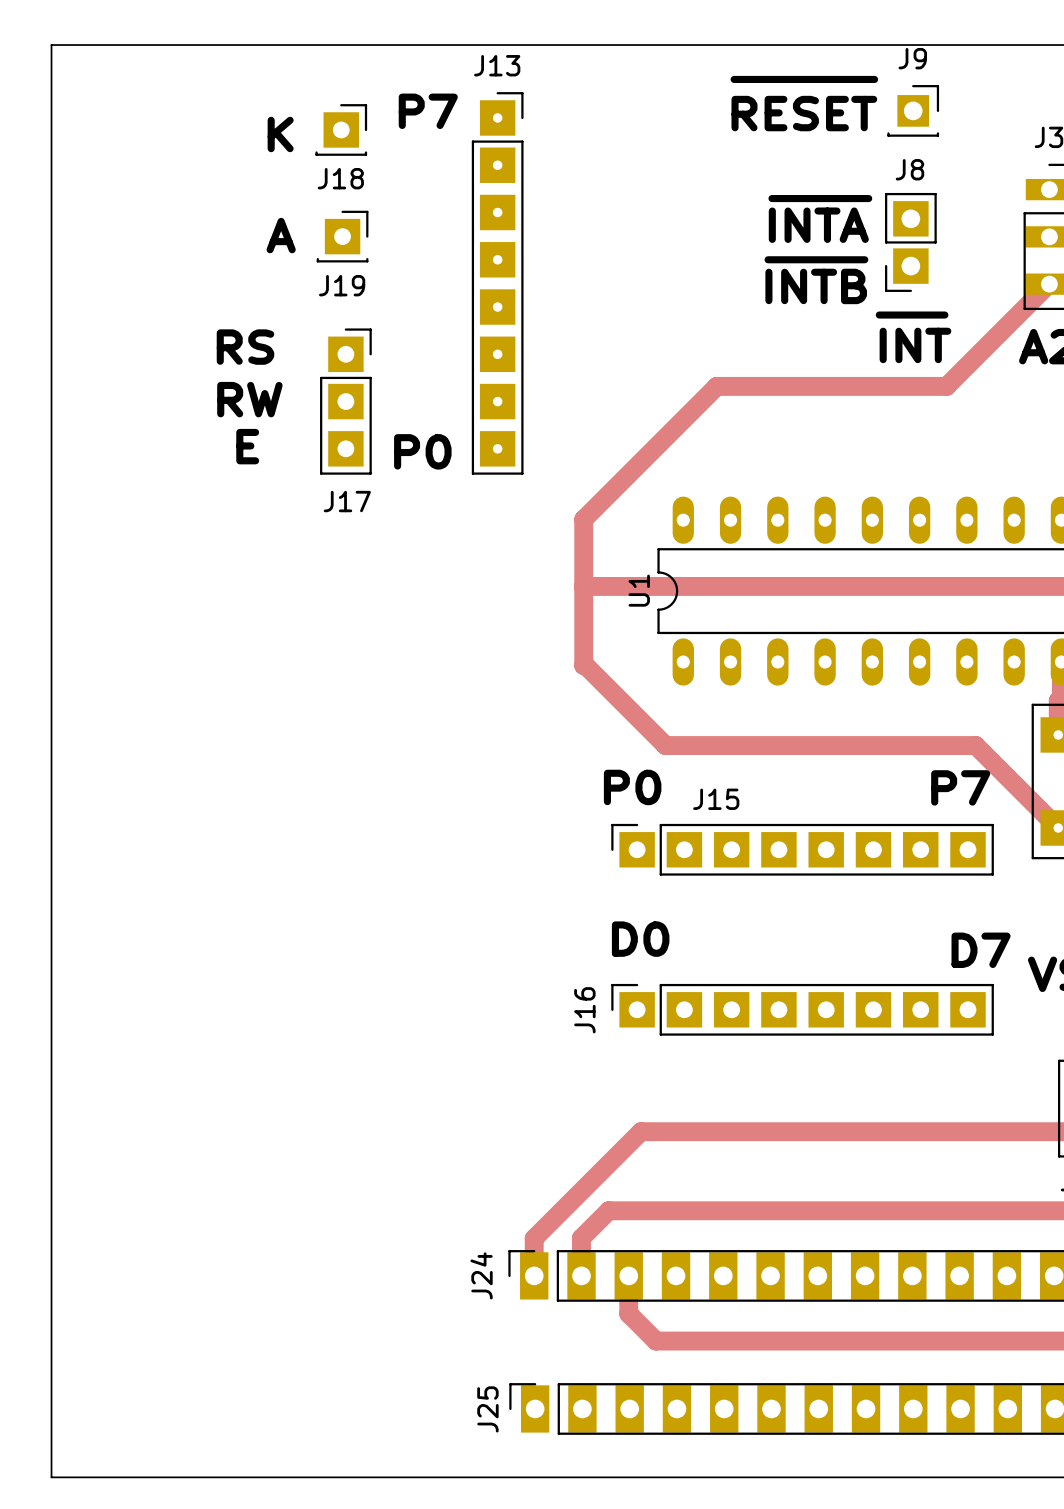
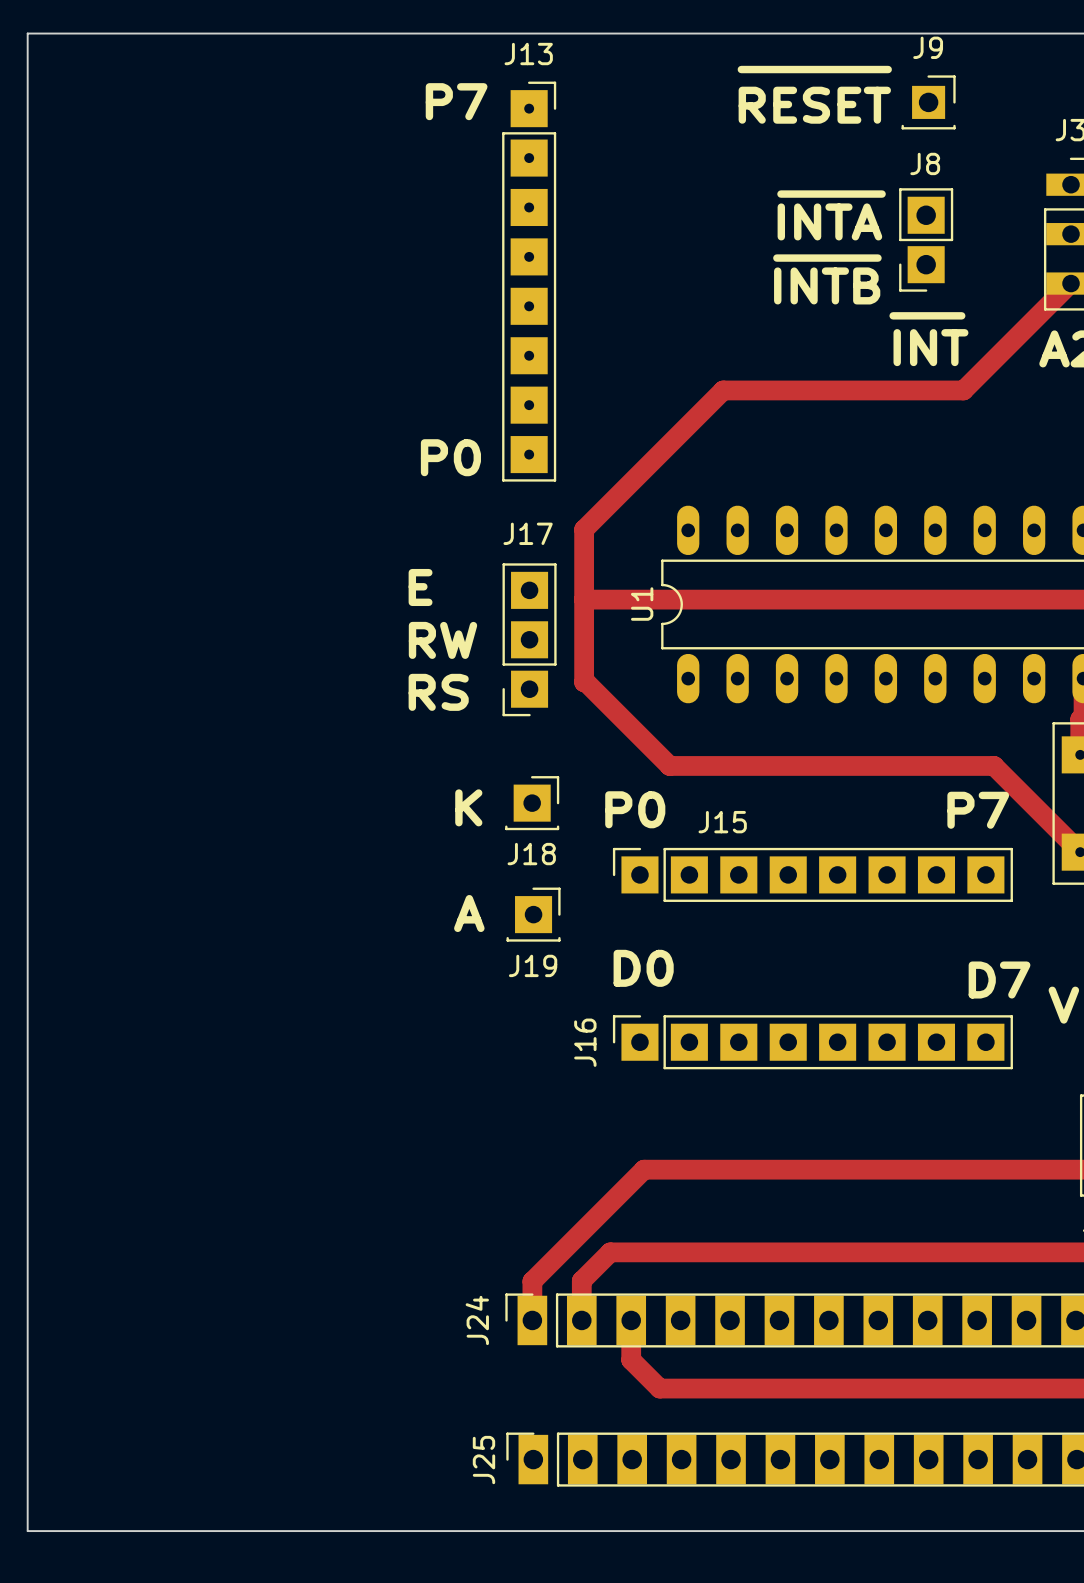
text position: P7 (428, 111) -> P7 (456, 101)
J18 position: (341, 129) -> (532, 803)
J19 position: (342, 236) -> (533, 914)
J13 position: (497, 283) -> (529, 281)
text position: RS (245, 347) -> RS (438, 692)
text position: RW (249, 399) -> RW (442, 640)
J17 rotation: 0° (345, 401) -> 180° (529, 639)
J17 position: (345, 401) -> (529, 639)
text position: E (247, 446) -> E (420, 587)
text position: P0 (422, 451) -> P0 (450, 457)

